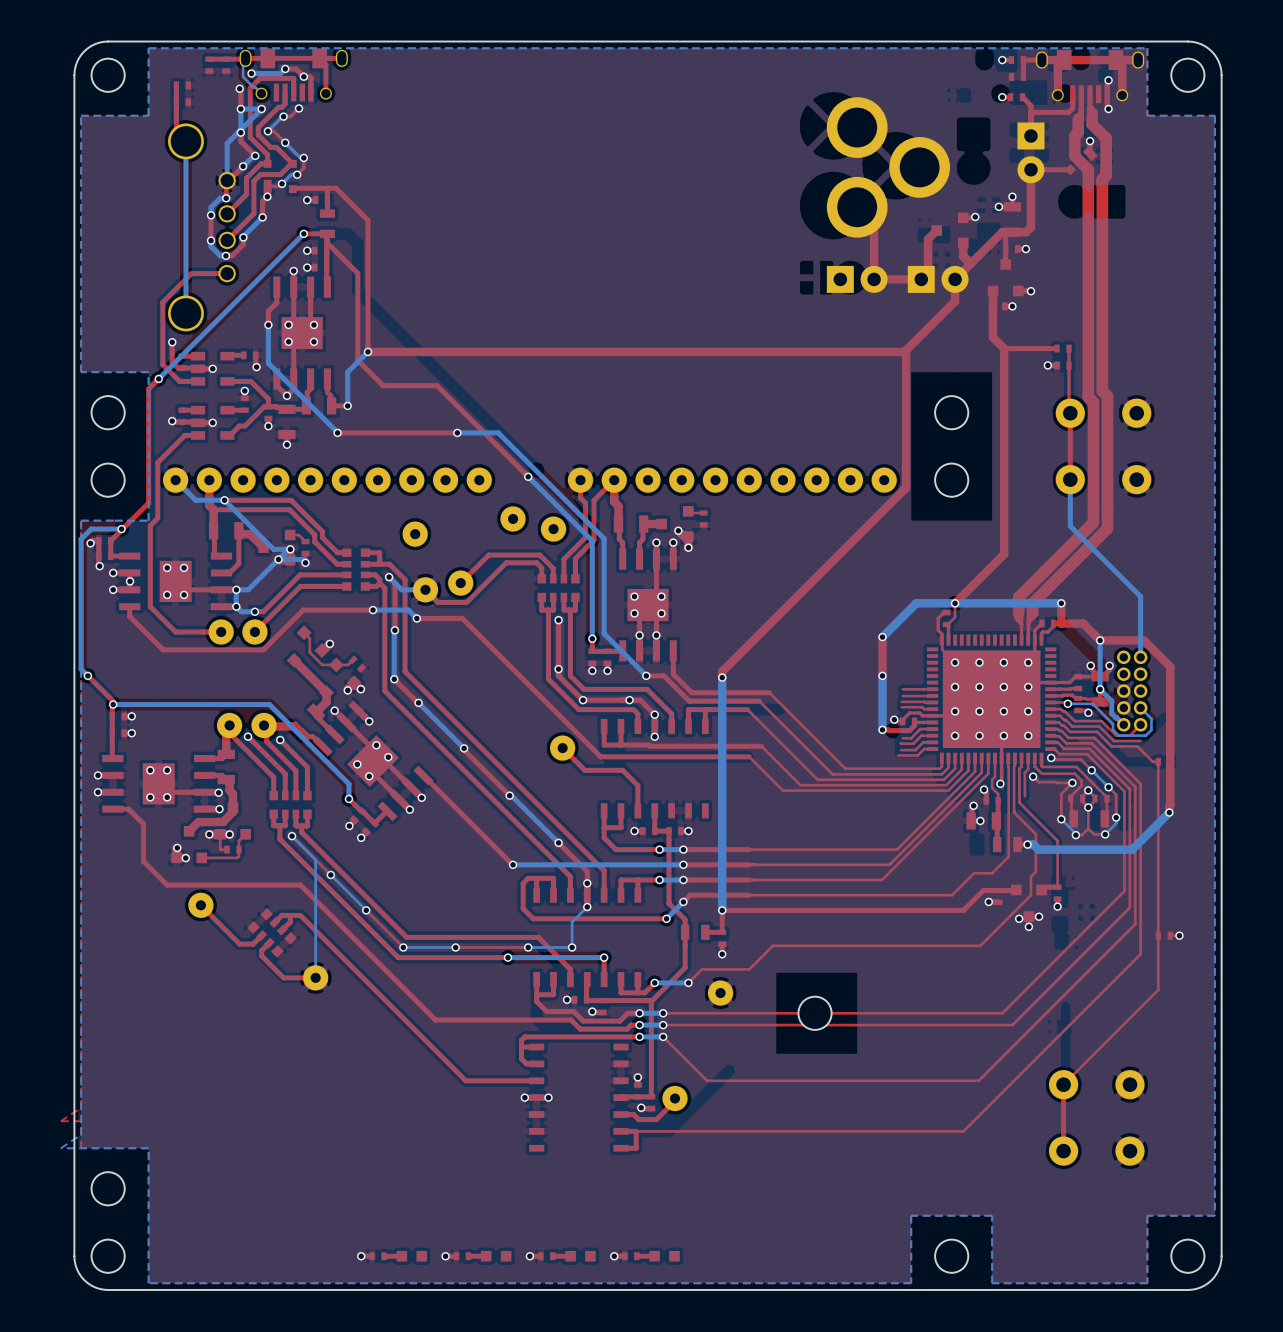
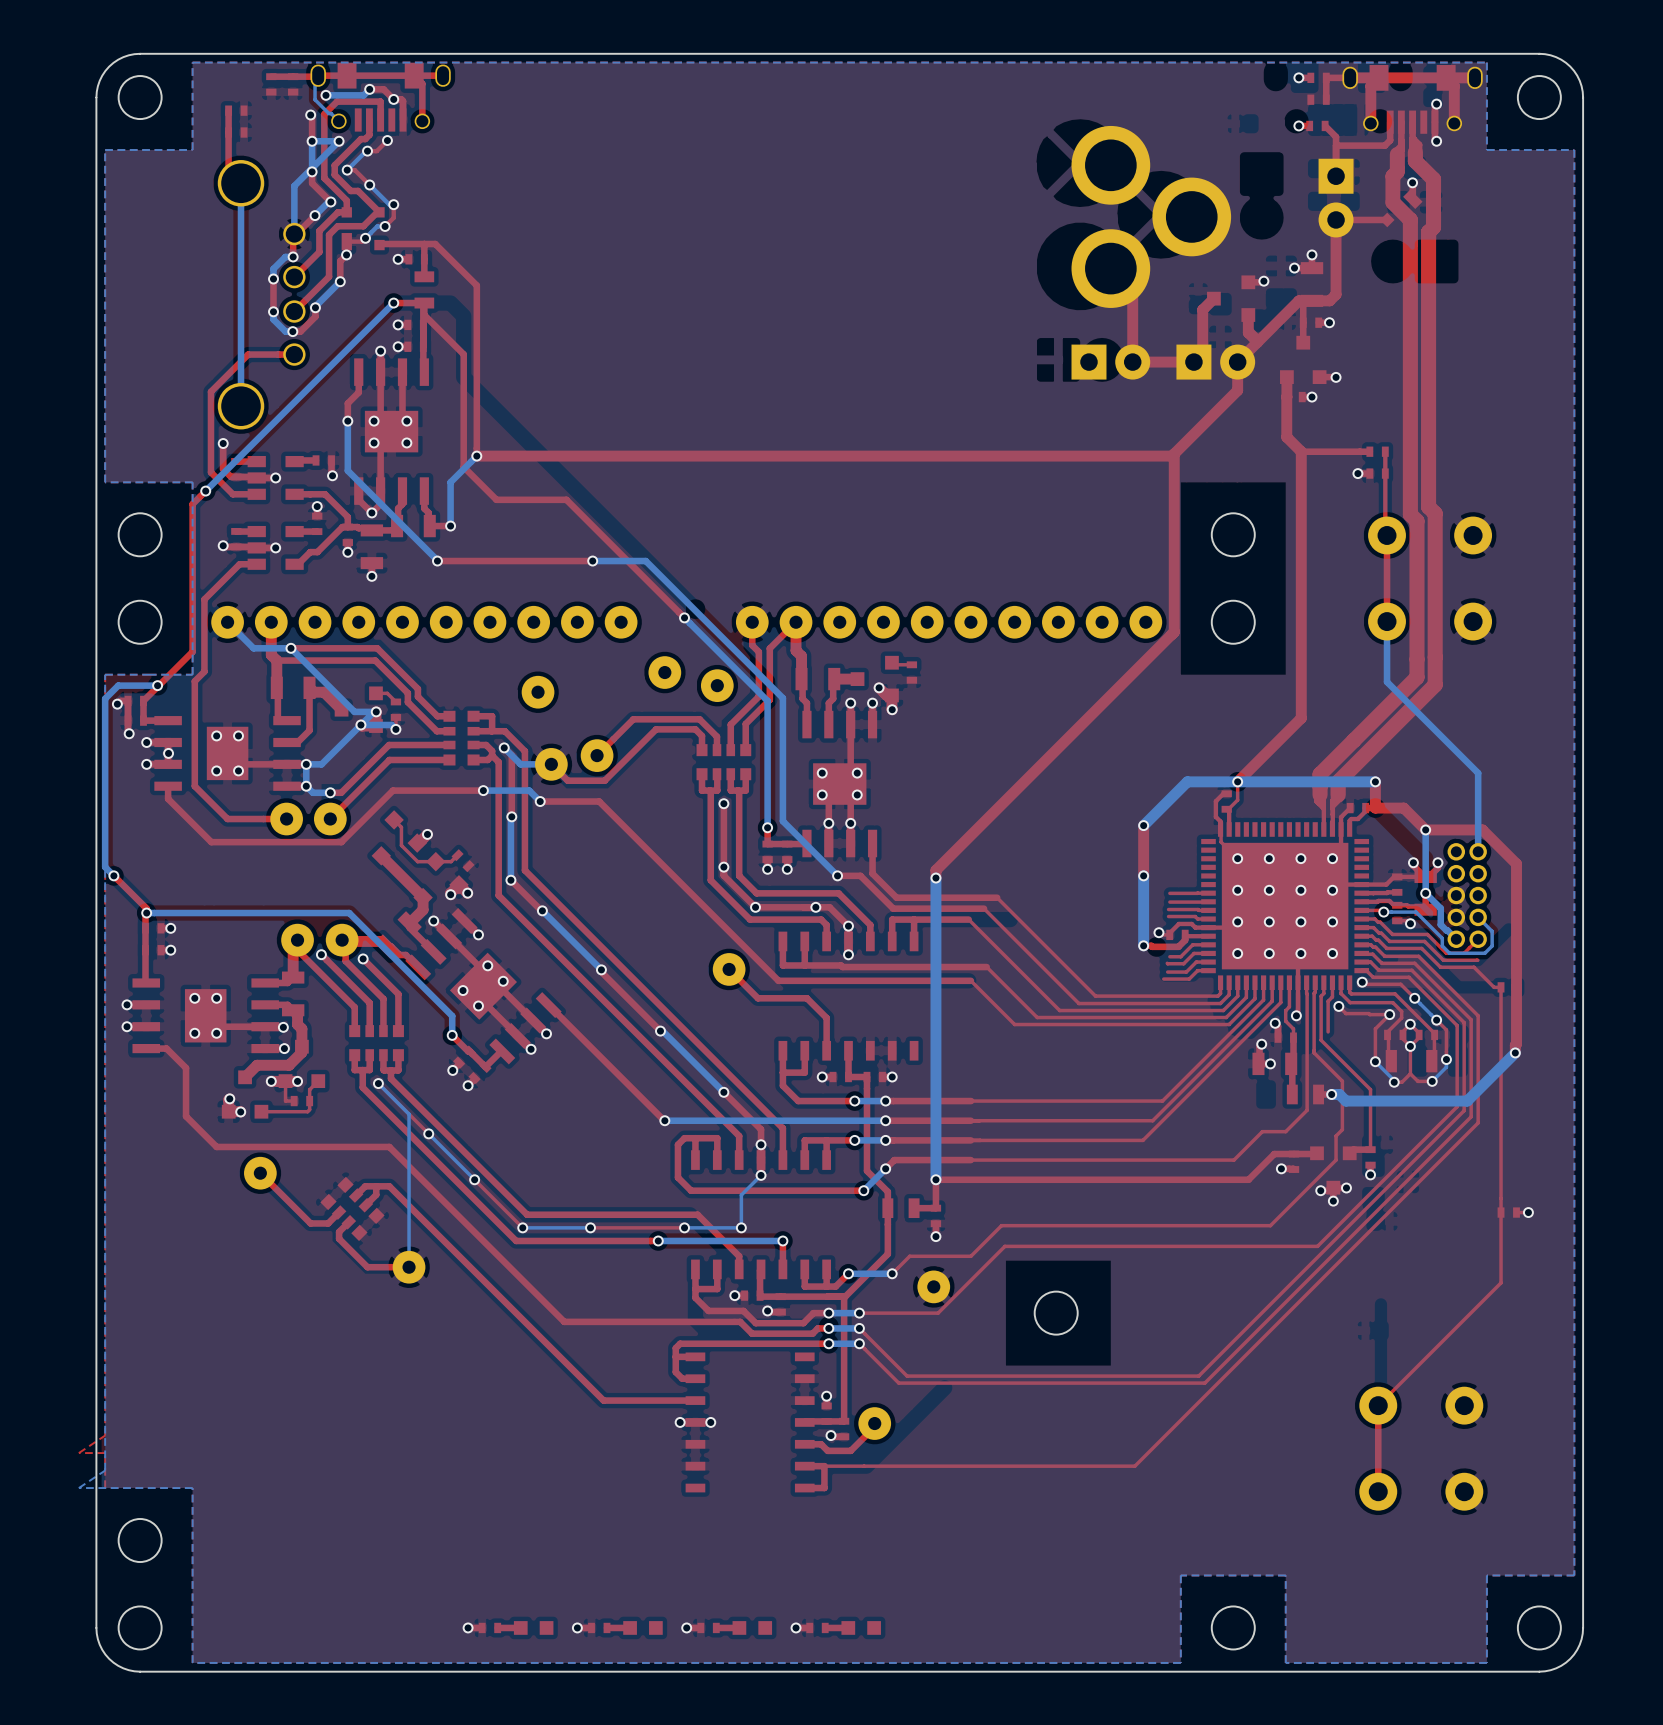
top track: (1124, 854) (1124, 891) (1002, 1013) (723, 1013) -> (1457, 1106) (1317, 1246) (1004, 1246) (938, 1313)
top track: (1129, 857) (1129, 907) (1012, 1025) (663, 1025) -> (1464, 1110) (1198, 1376) (907, 1376) (859, 1328)
top track: (1135, 861) (1135, 924) (978, 1080) (707, 1080) (693, 1067) -> (1471, 1116) (1204, 1383) (898, 1383)
top track: (1140, 866) (1140, 954) (963, 1131) (875, 1131) -> (1478, 1122) (1134, 1466)

